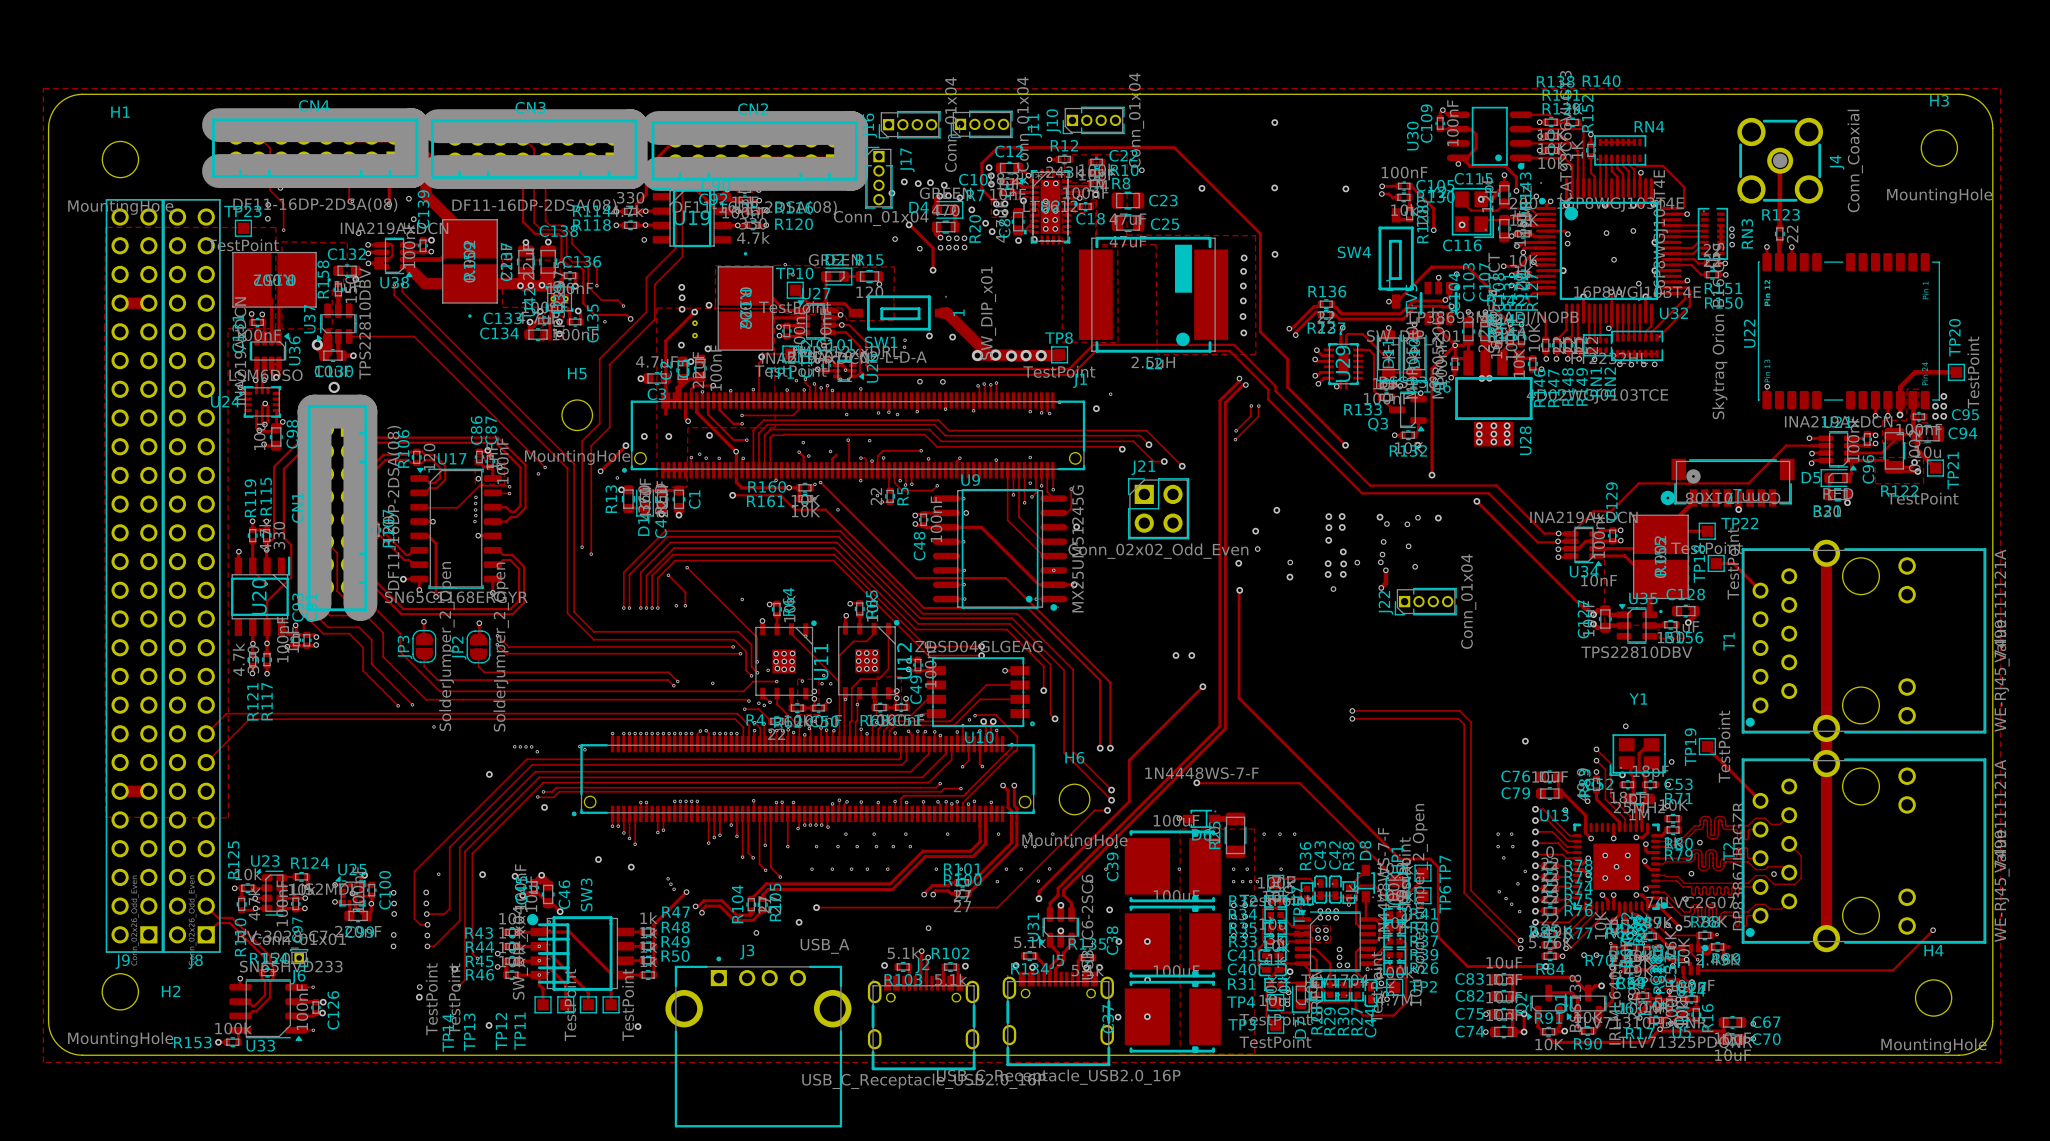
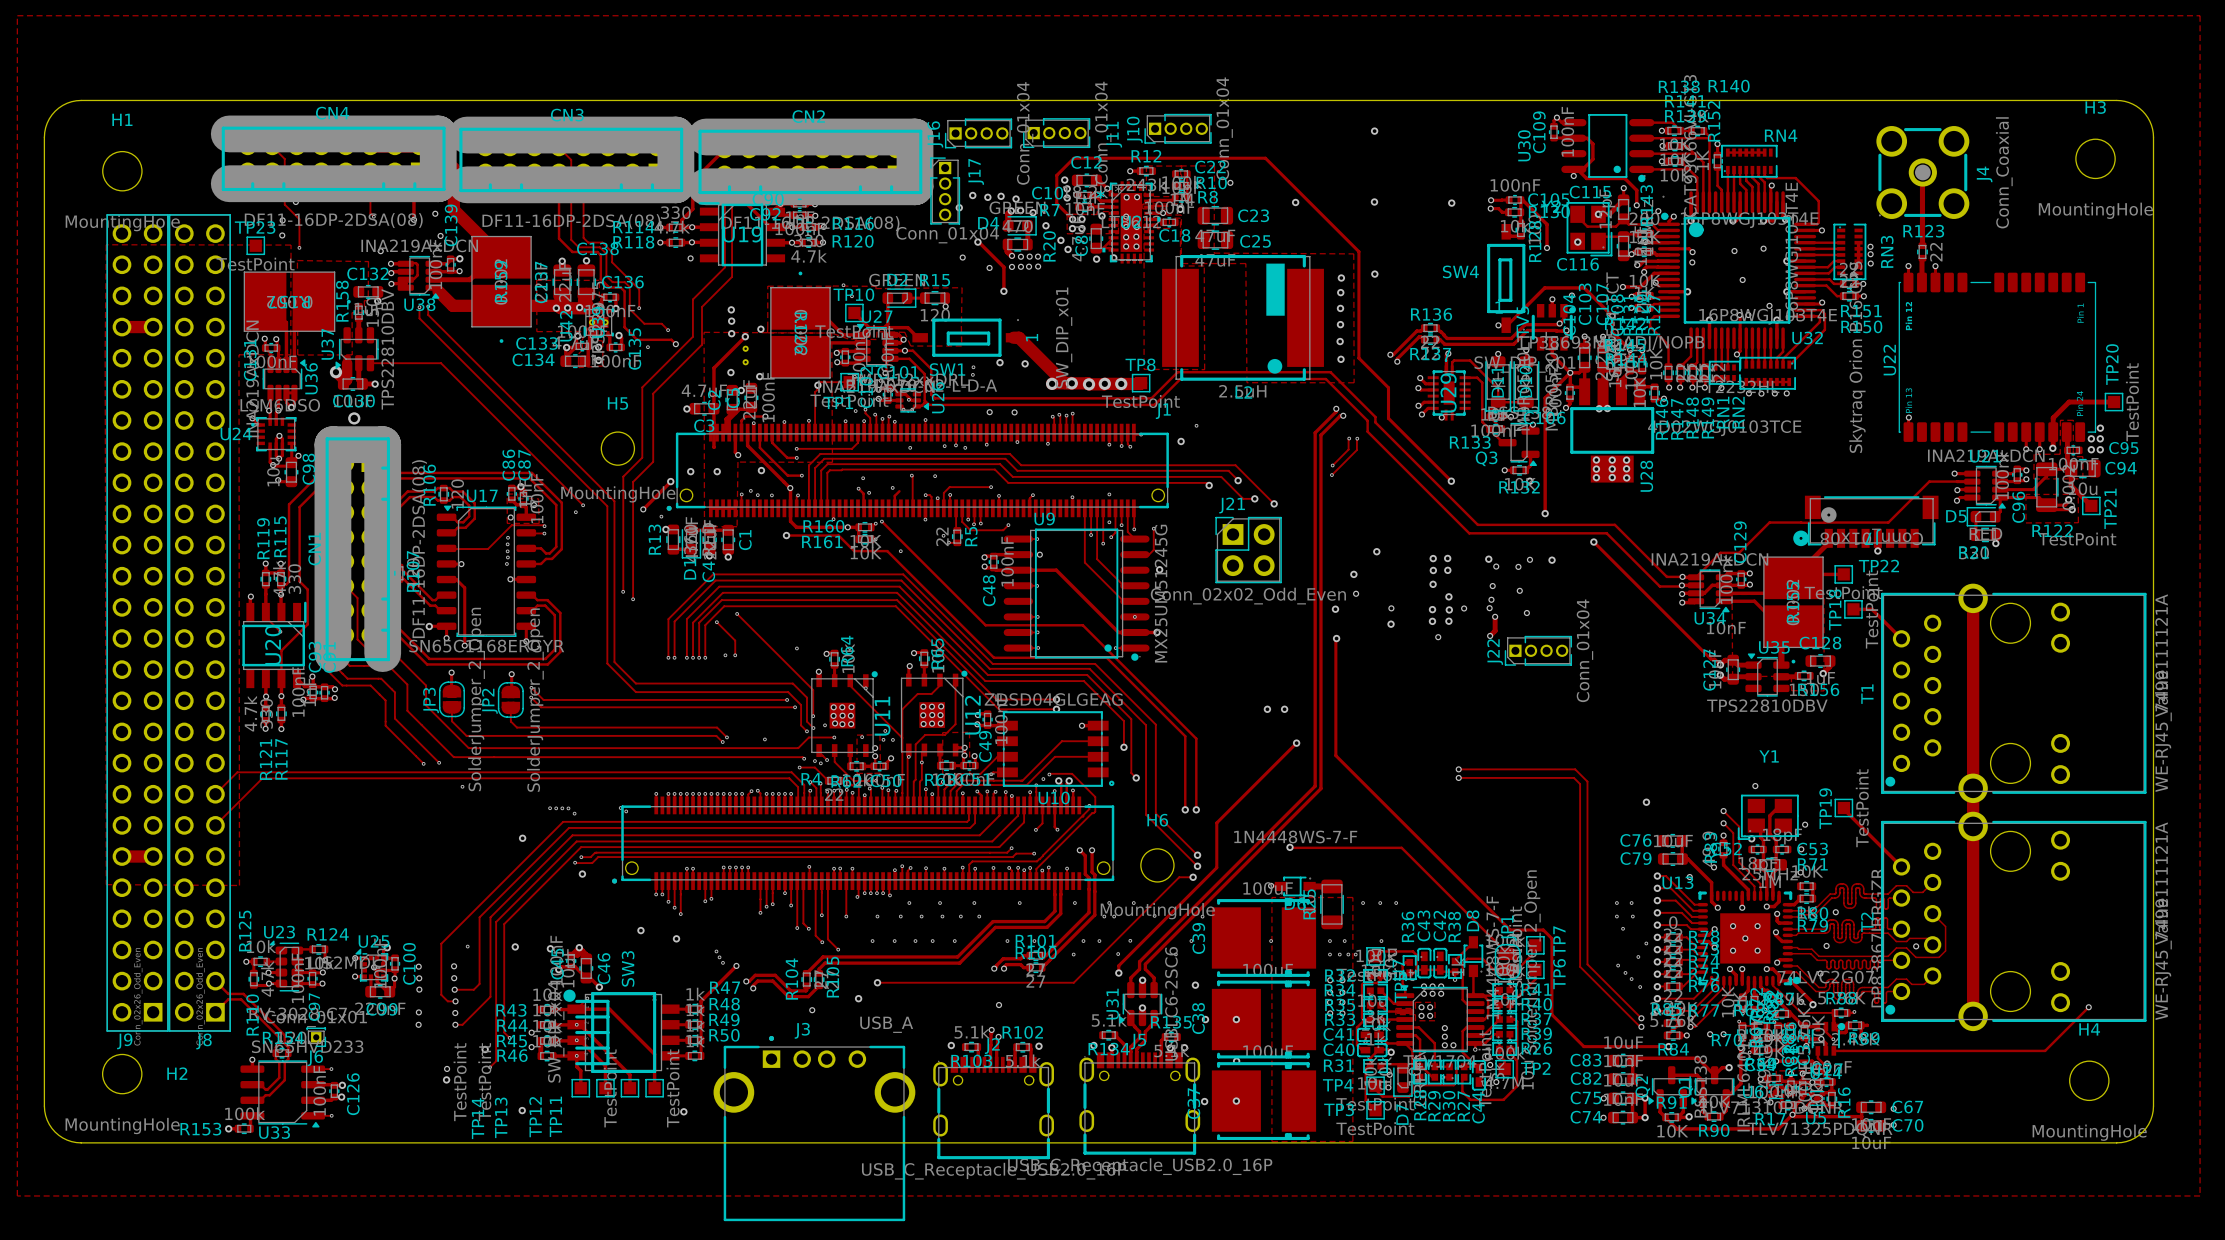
zone outline: (43, 88) (43, 1062) (2000, 1062) (2000, 88) (43, 88) -> (17, 15) (17, 1195) (2200, 1195) (2200, 15) (17, 15)

